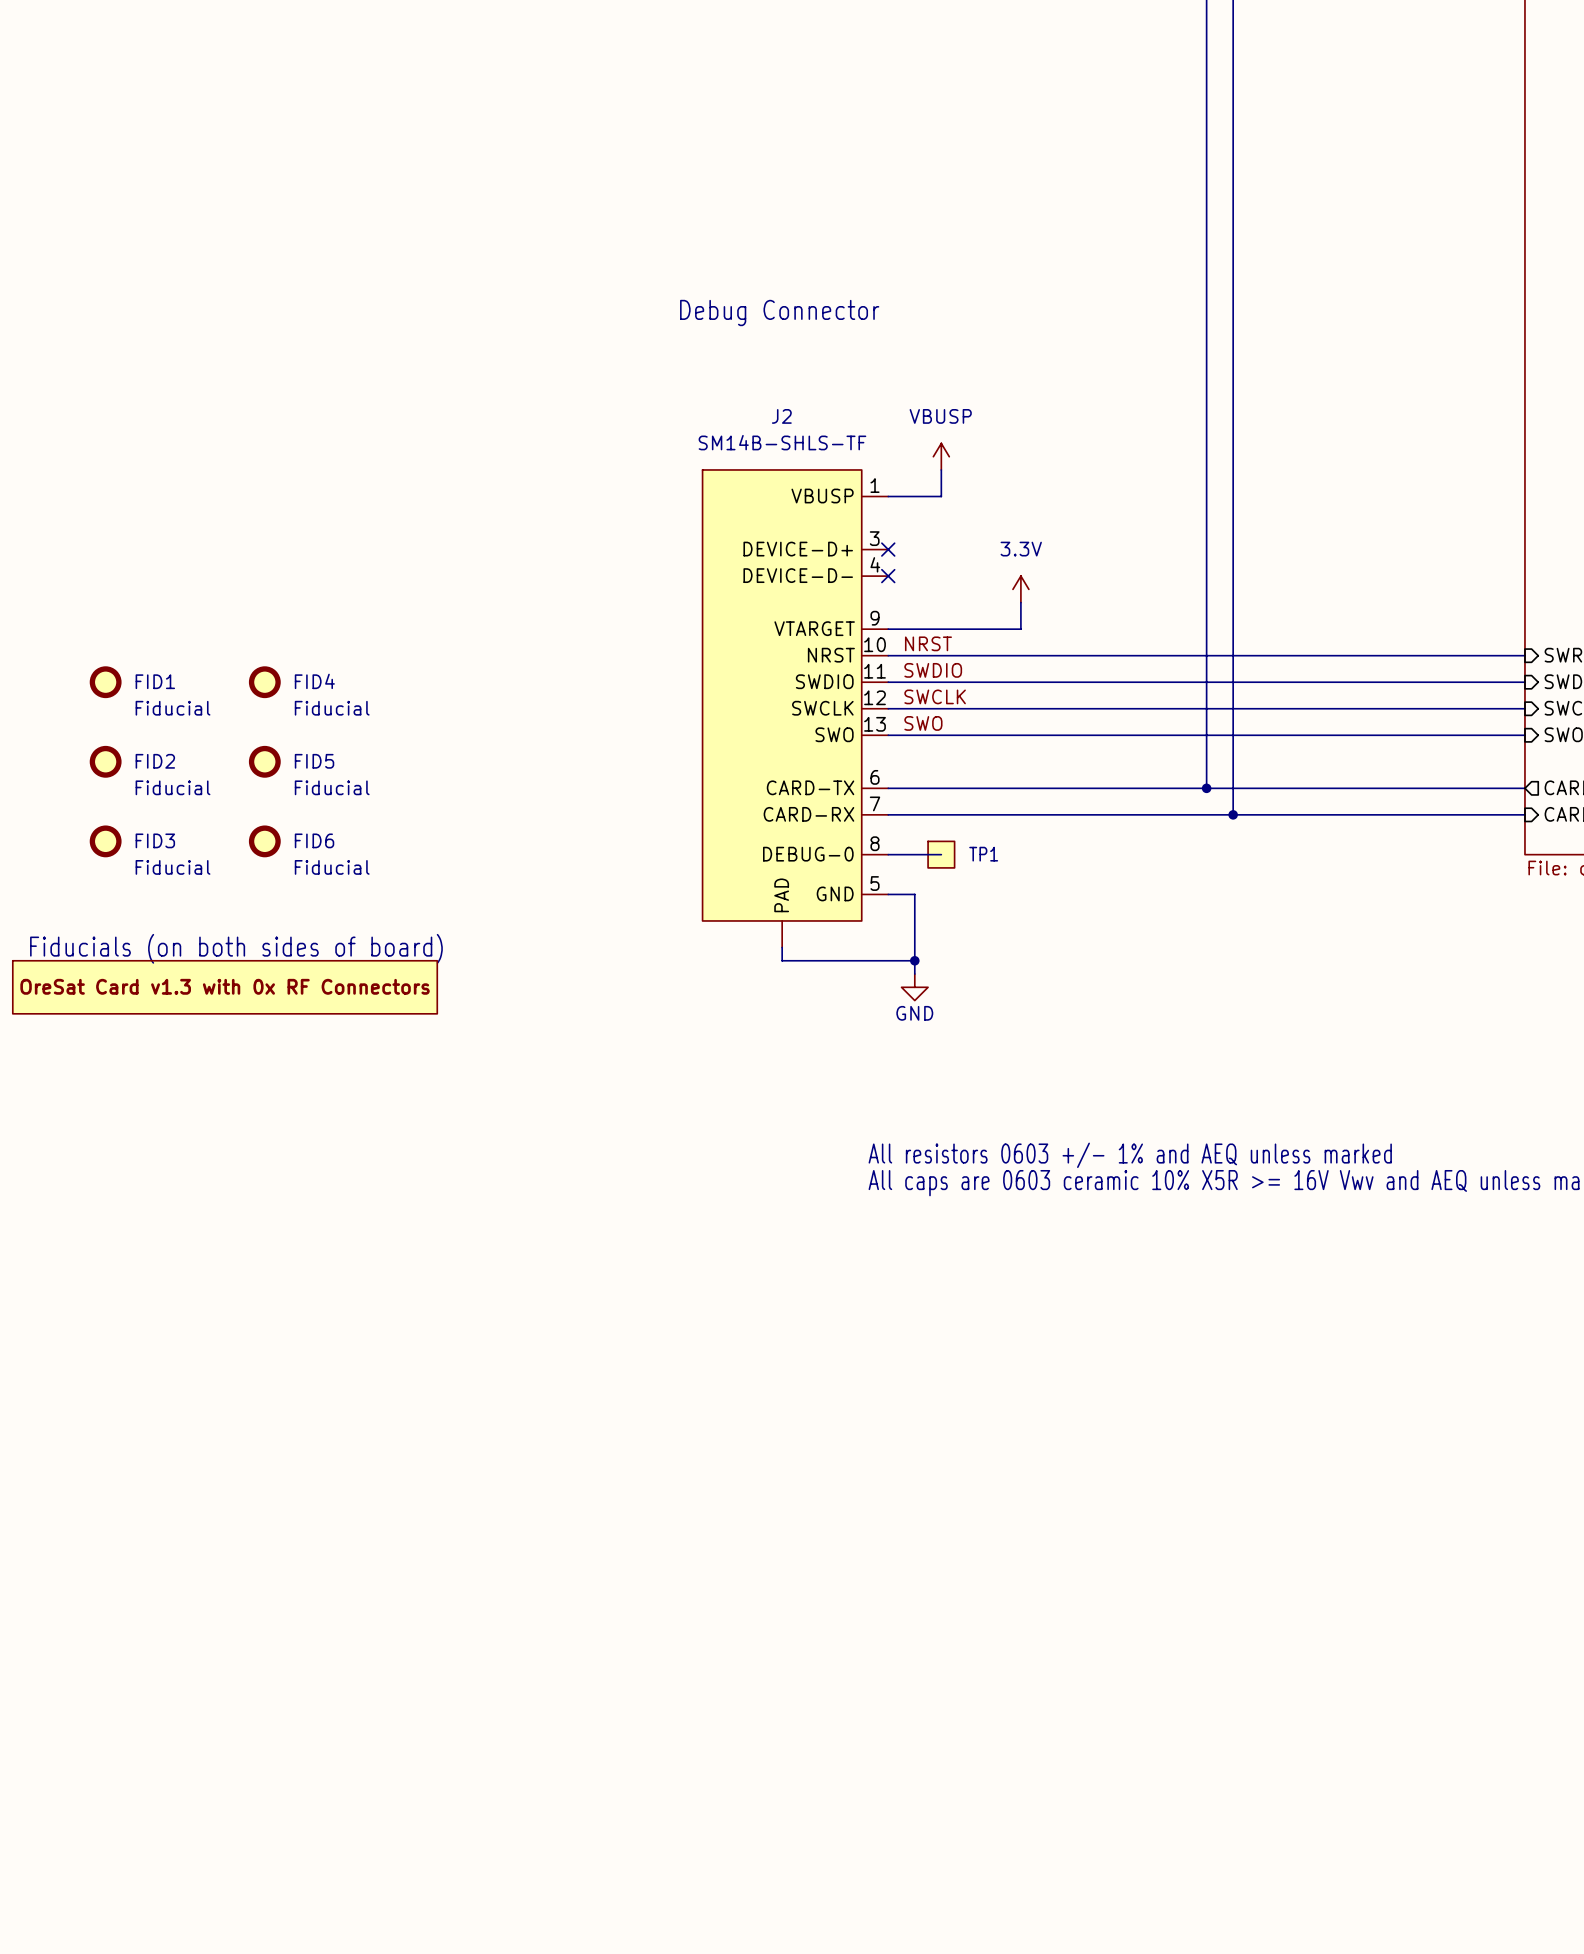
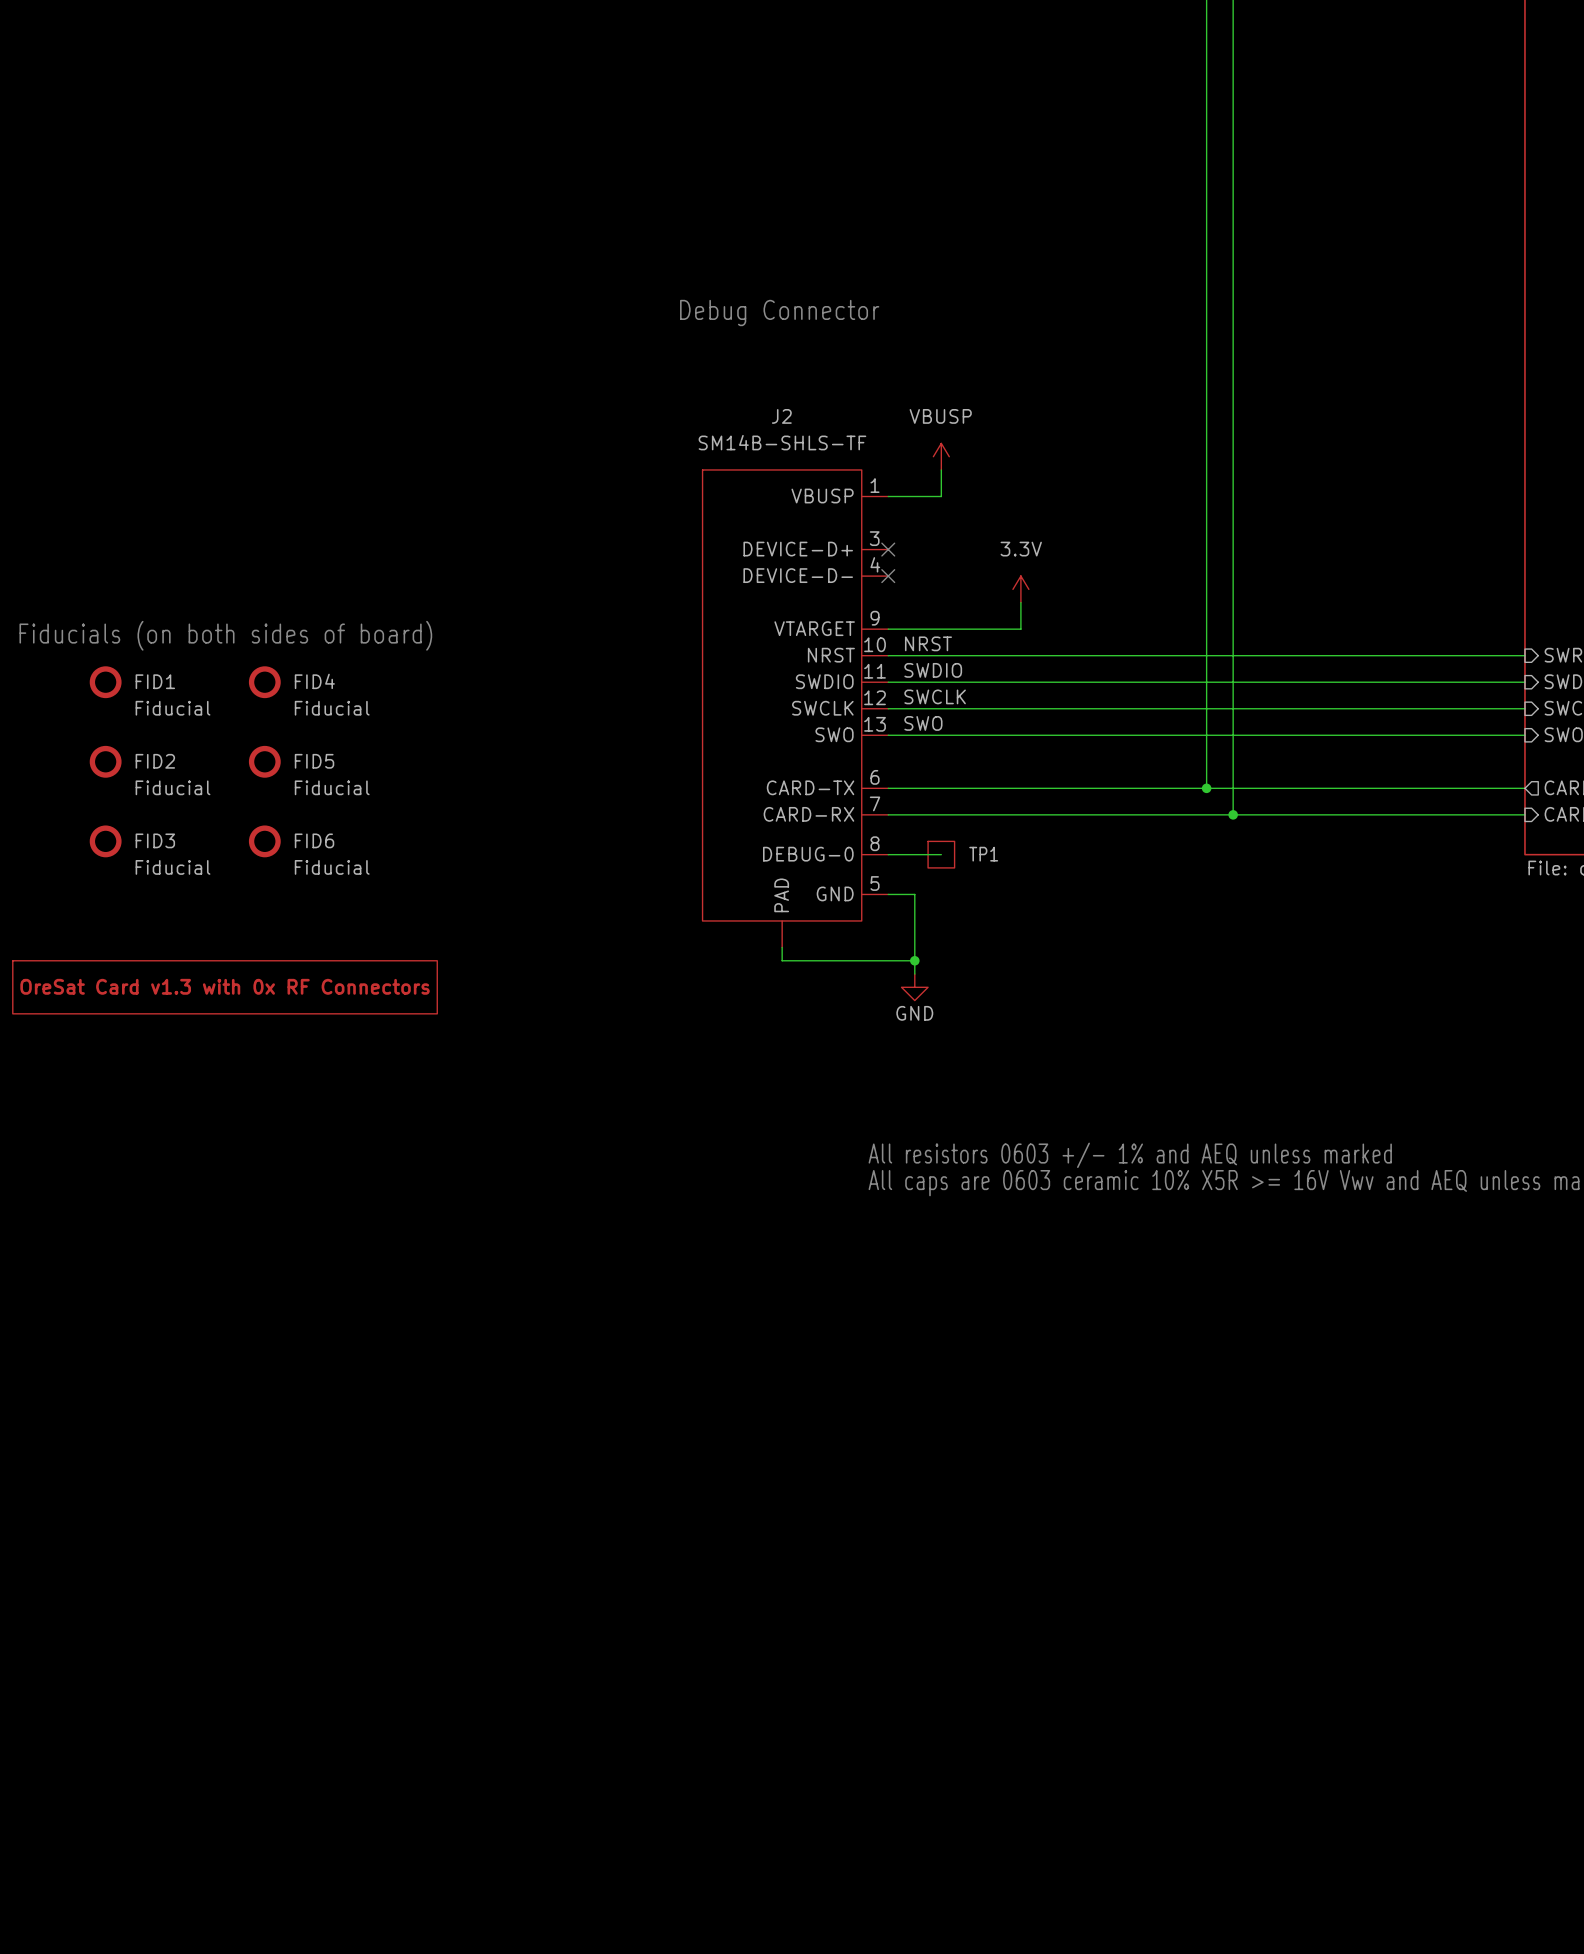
text: none -> Fiducials (on both sides of board) (225, 635)
text: Fiducials (on both sides of board) (236, 948) -> none

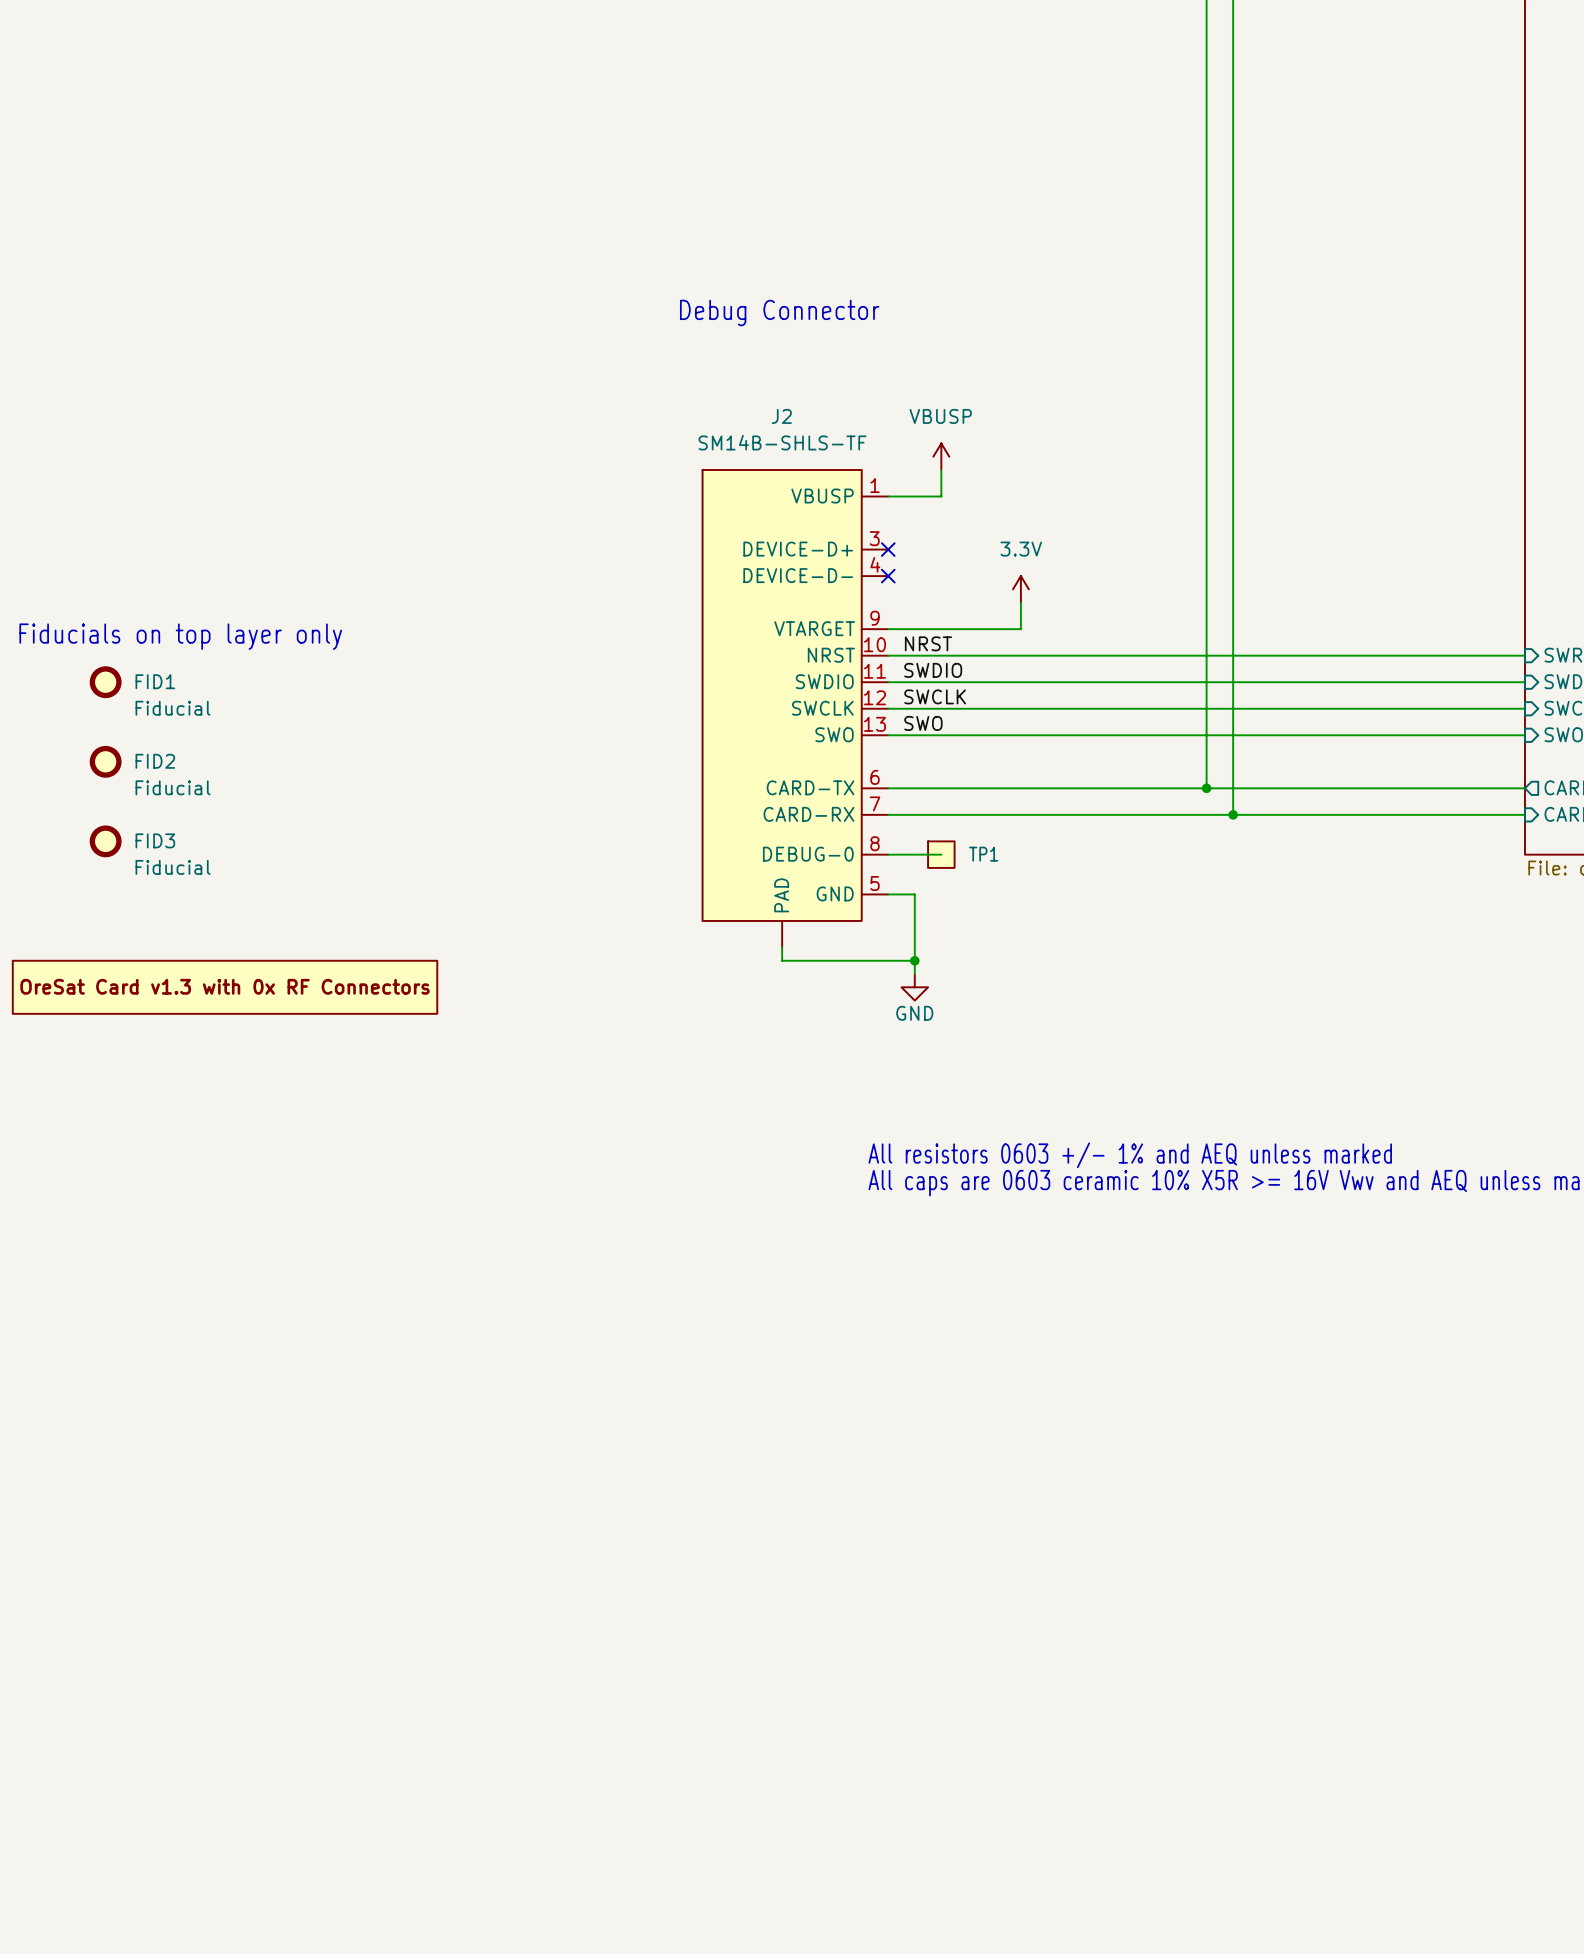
text: Fiducials (on both sides of board) (225, 635) -> Fiducials on top layer only (180, 636)
FID4: Fiducial (264, 682) -> none
FID5: Fiducial (264, 761) -> none
FID6: Fiducial (264, 841) -> none

